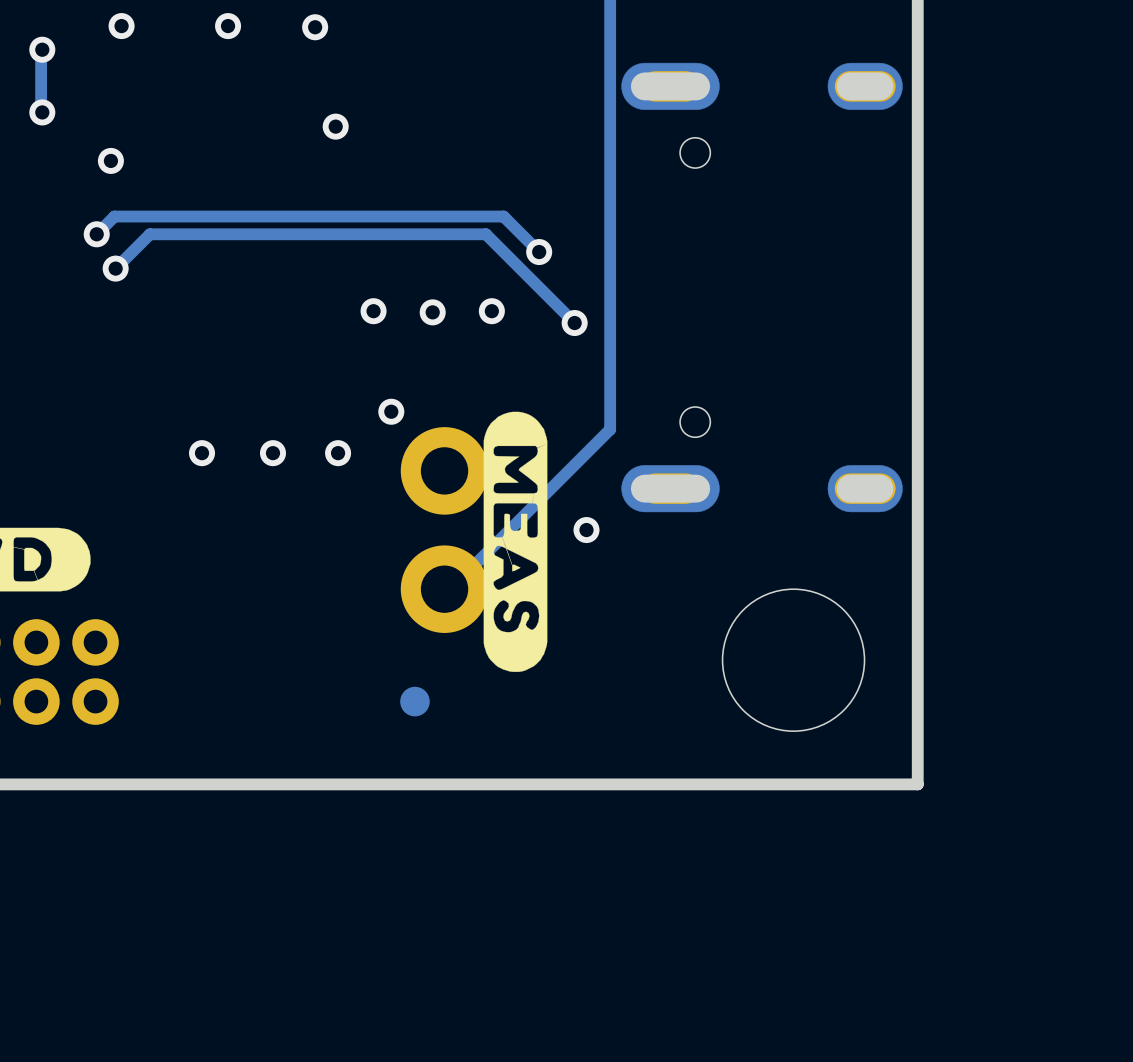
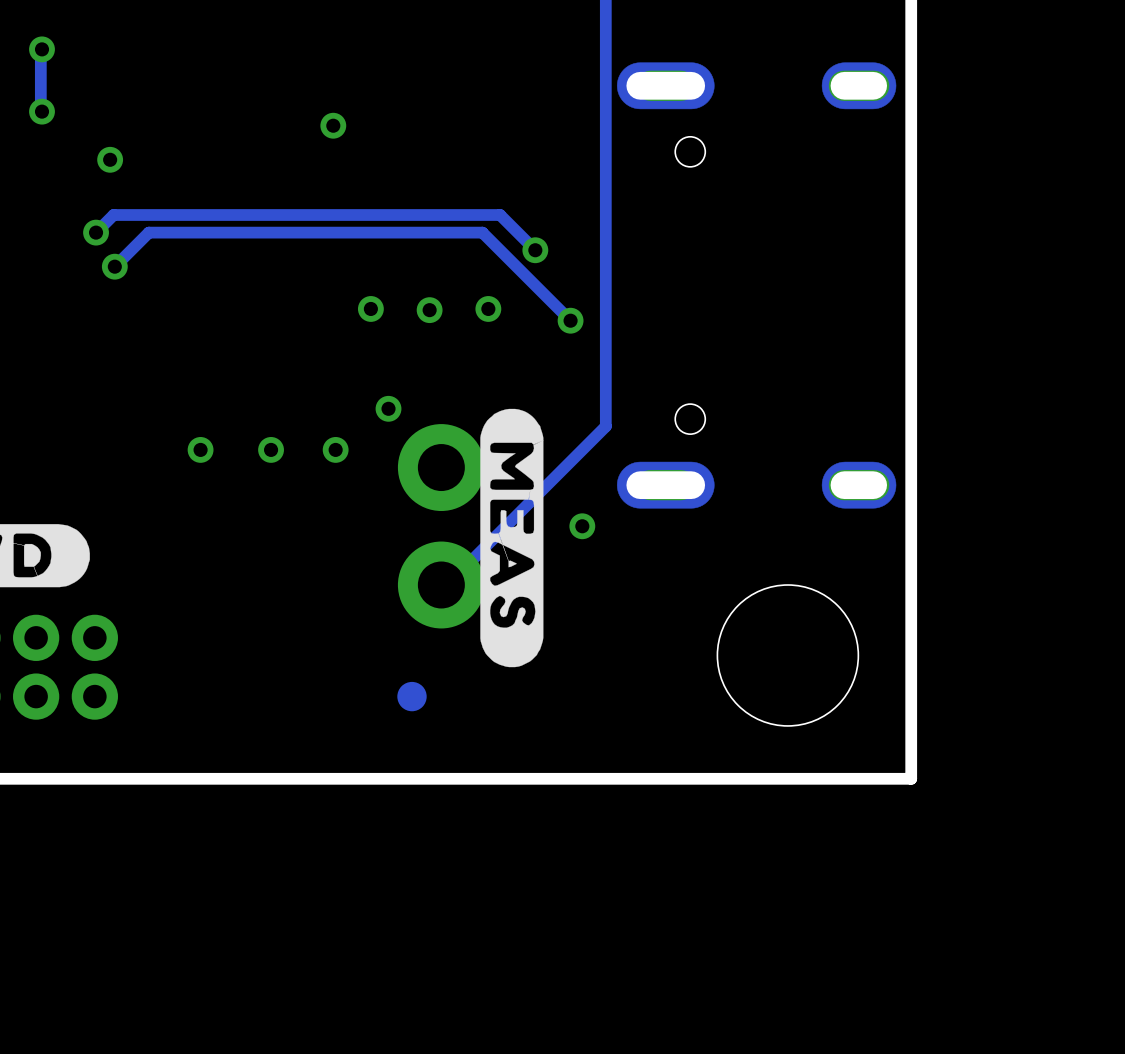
via: (121, 26) -> none
via: (228, 26) -> none
via: (315, 27) -> none

